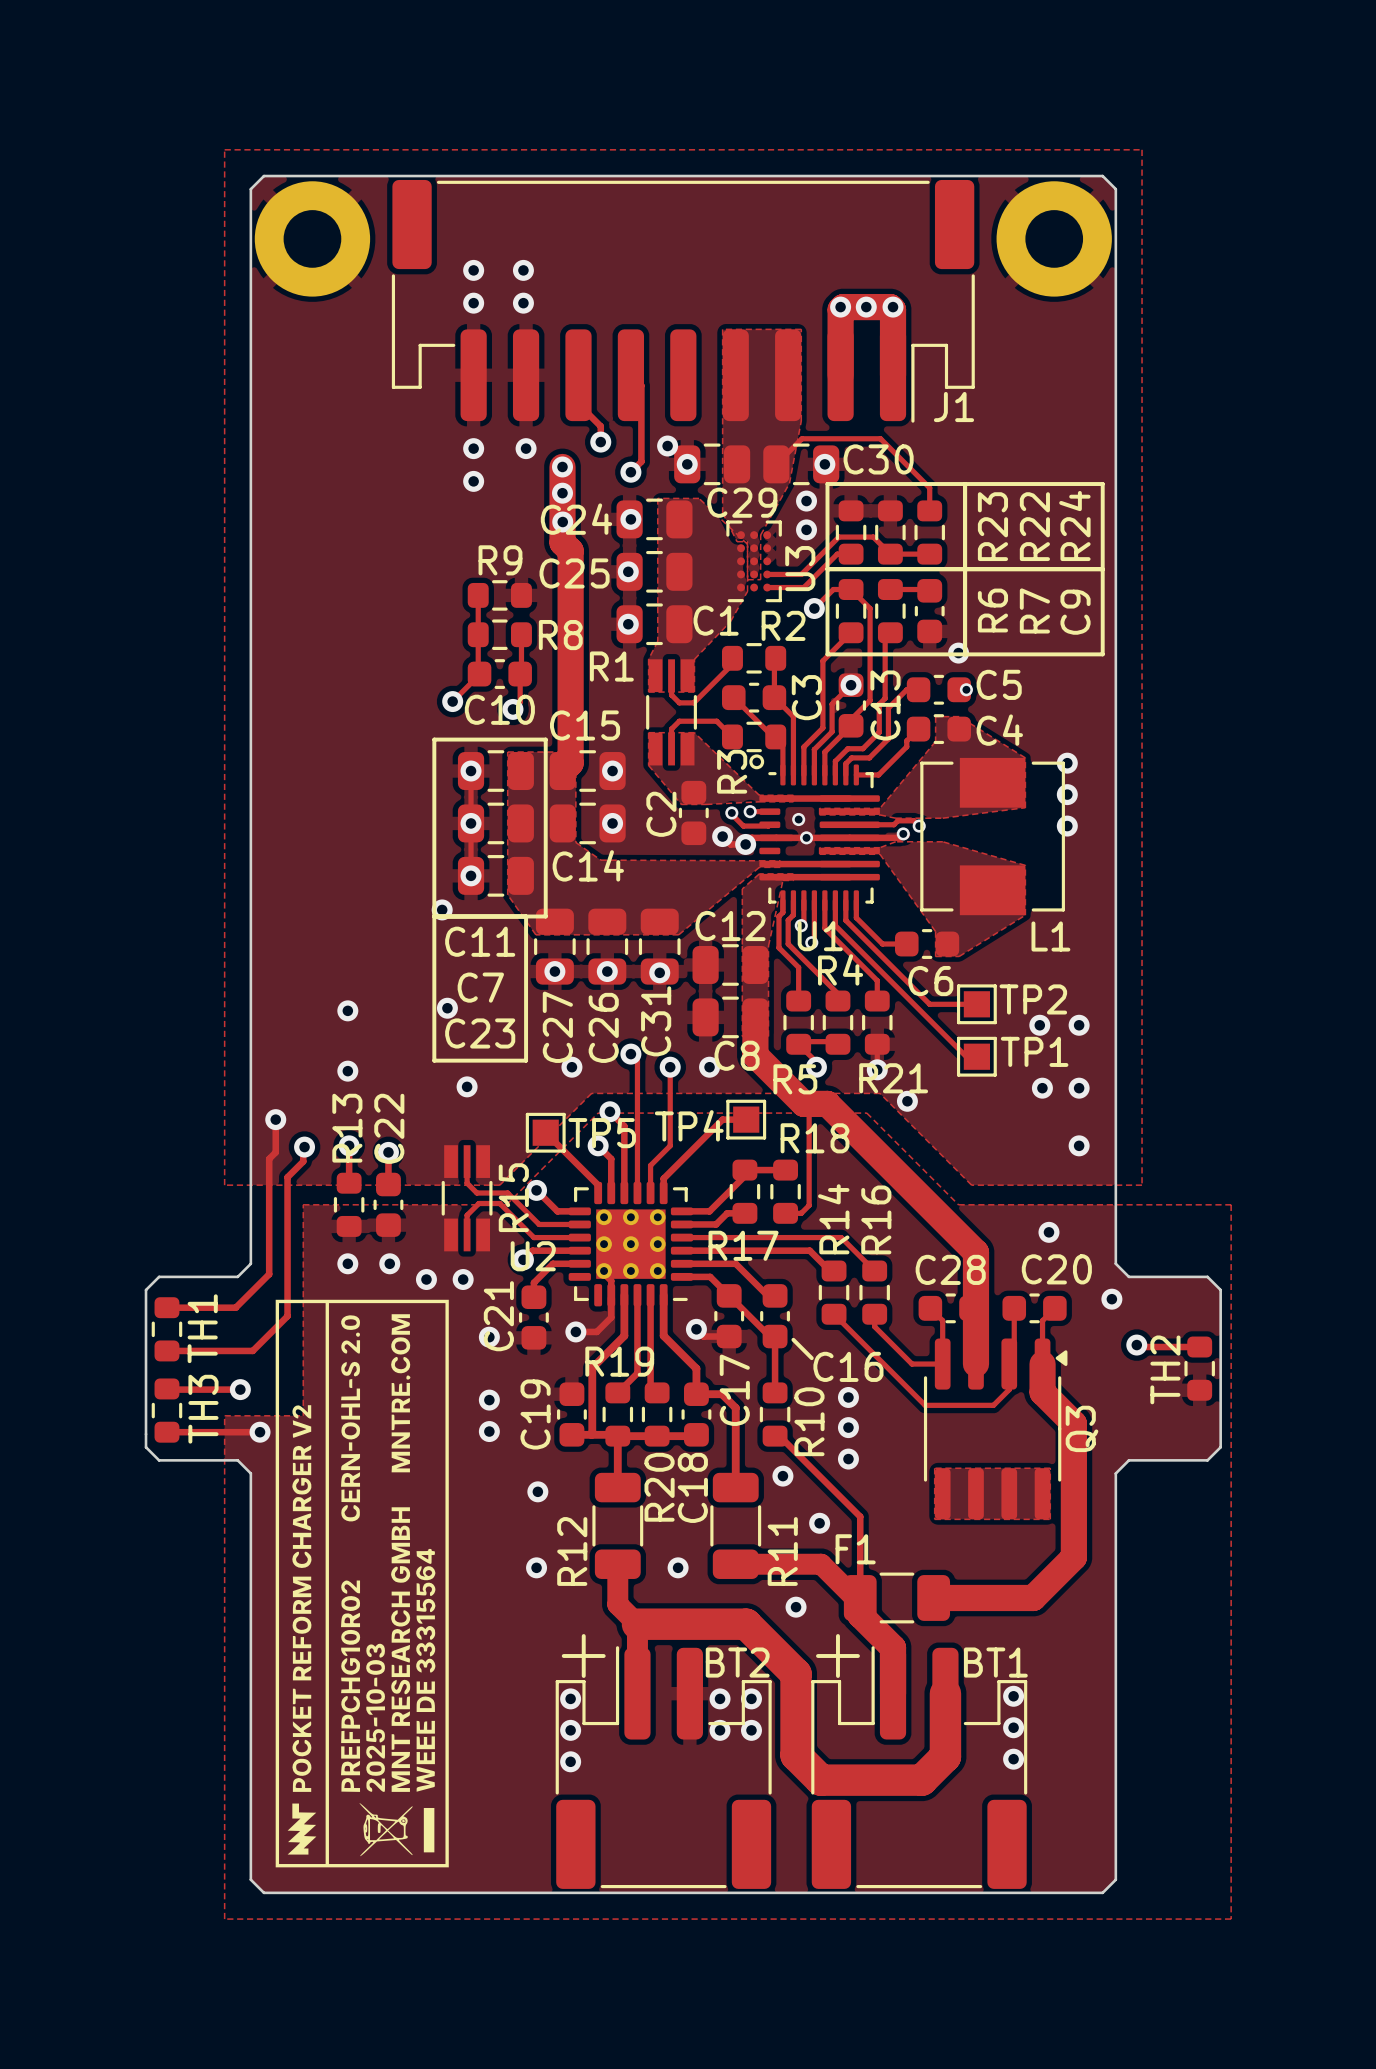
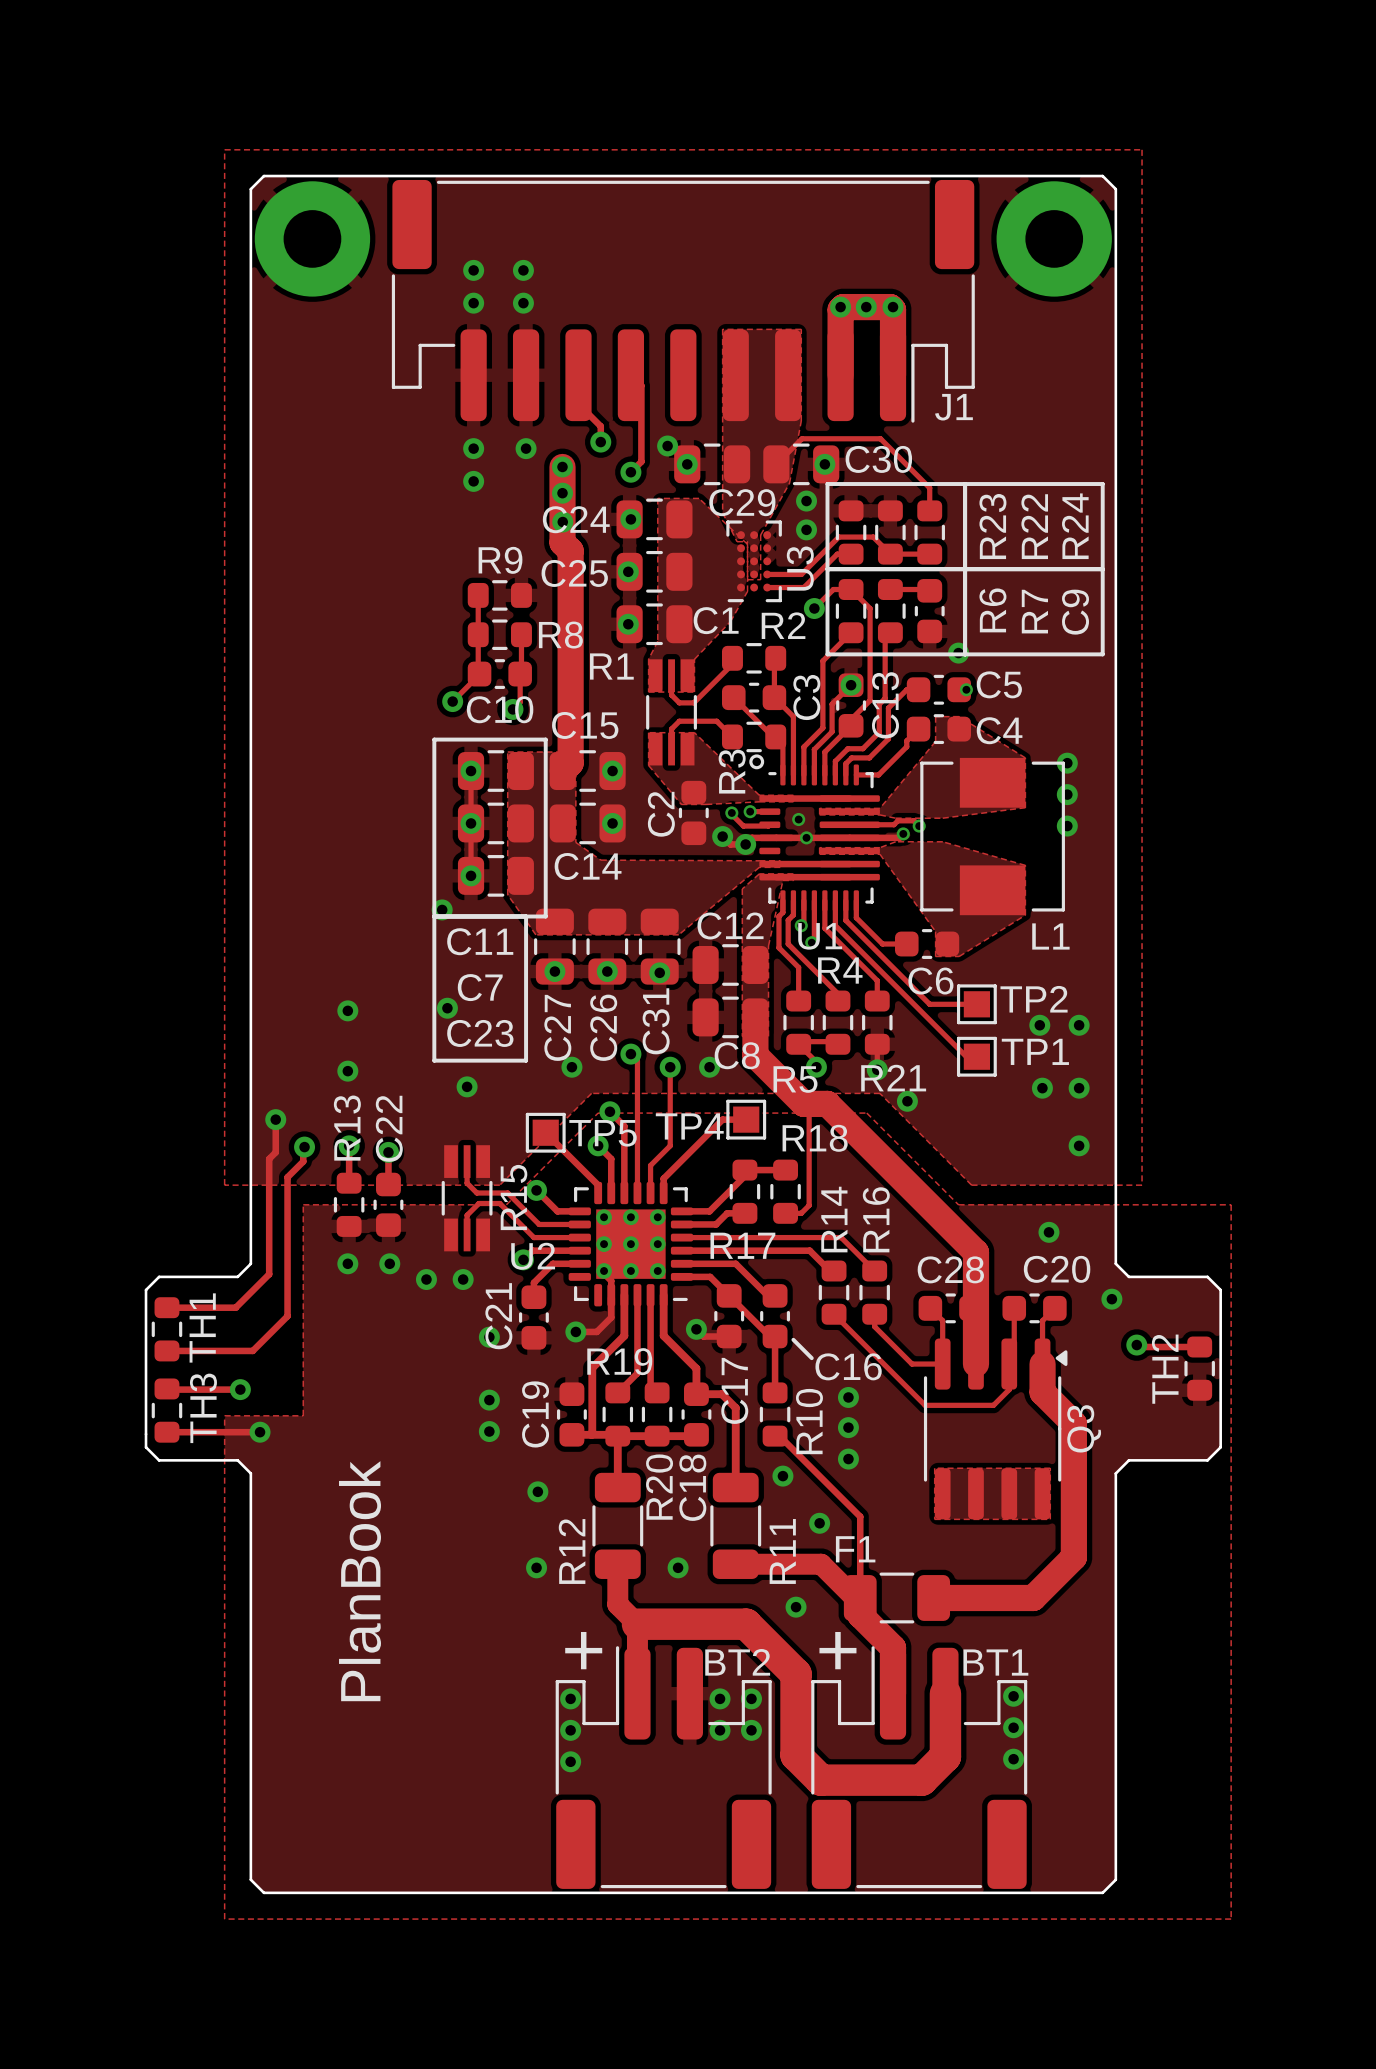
drawing: [275, 1299, 449, 1868] -> none
text: none -> PlanBook (360, 1581)

